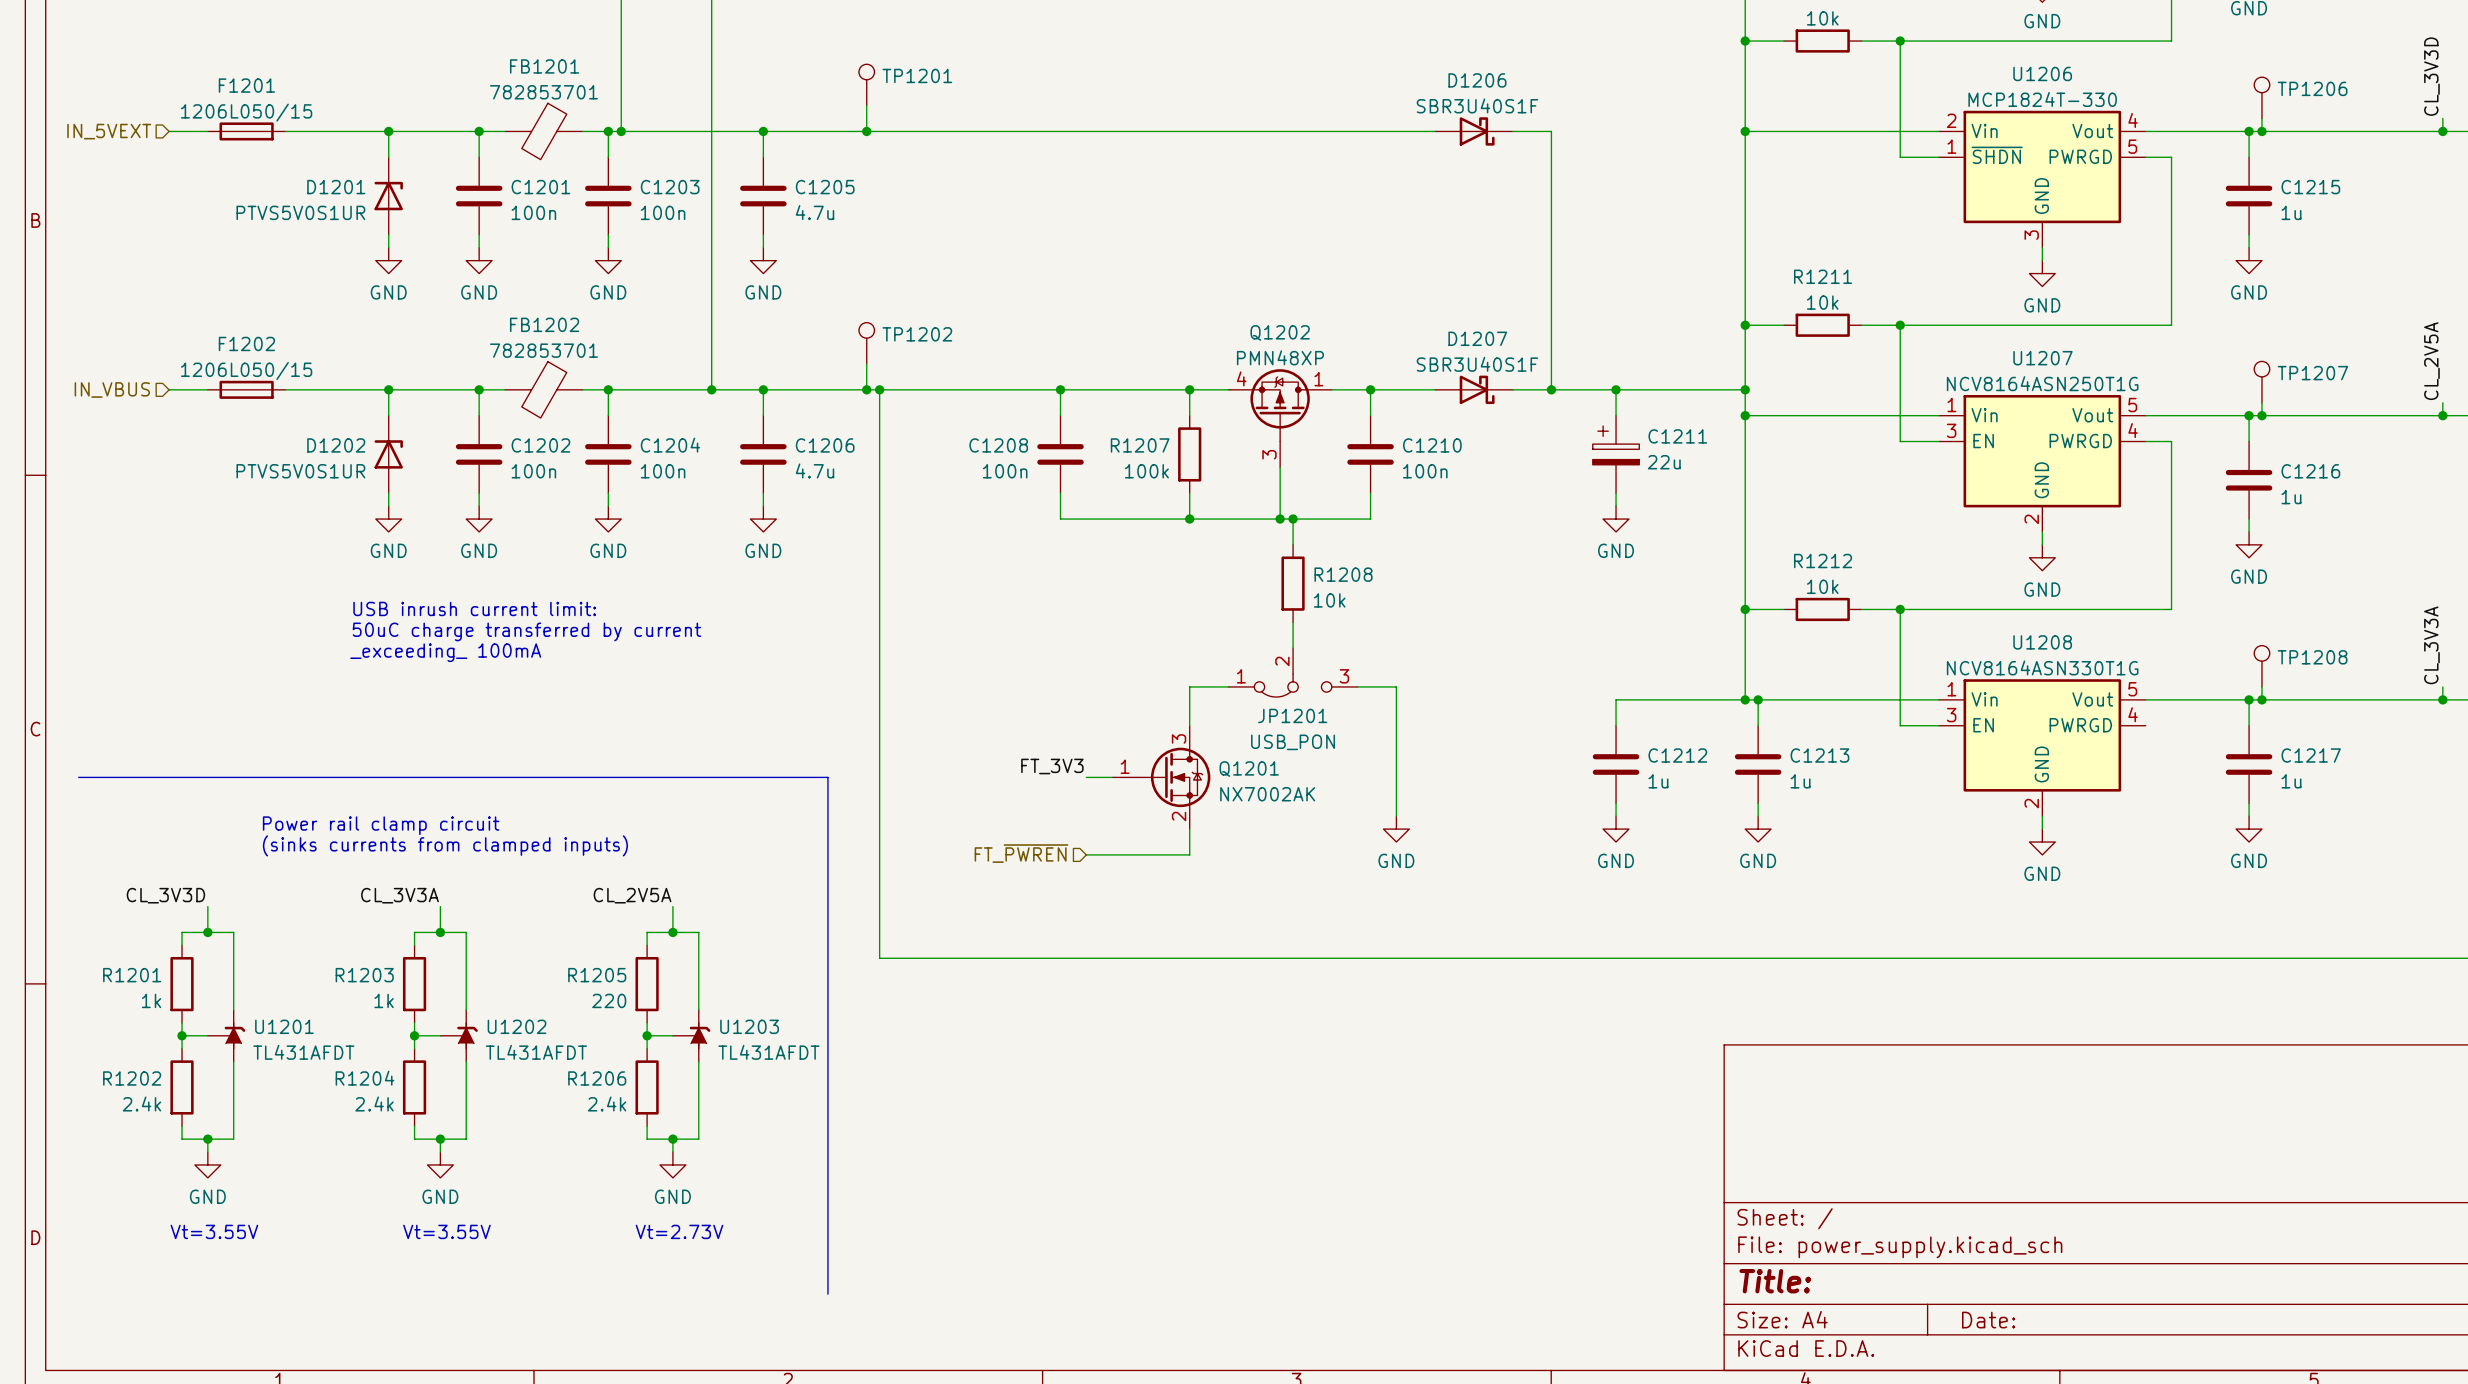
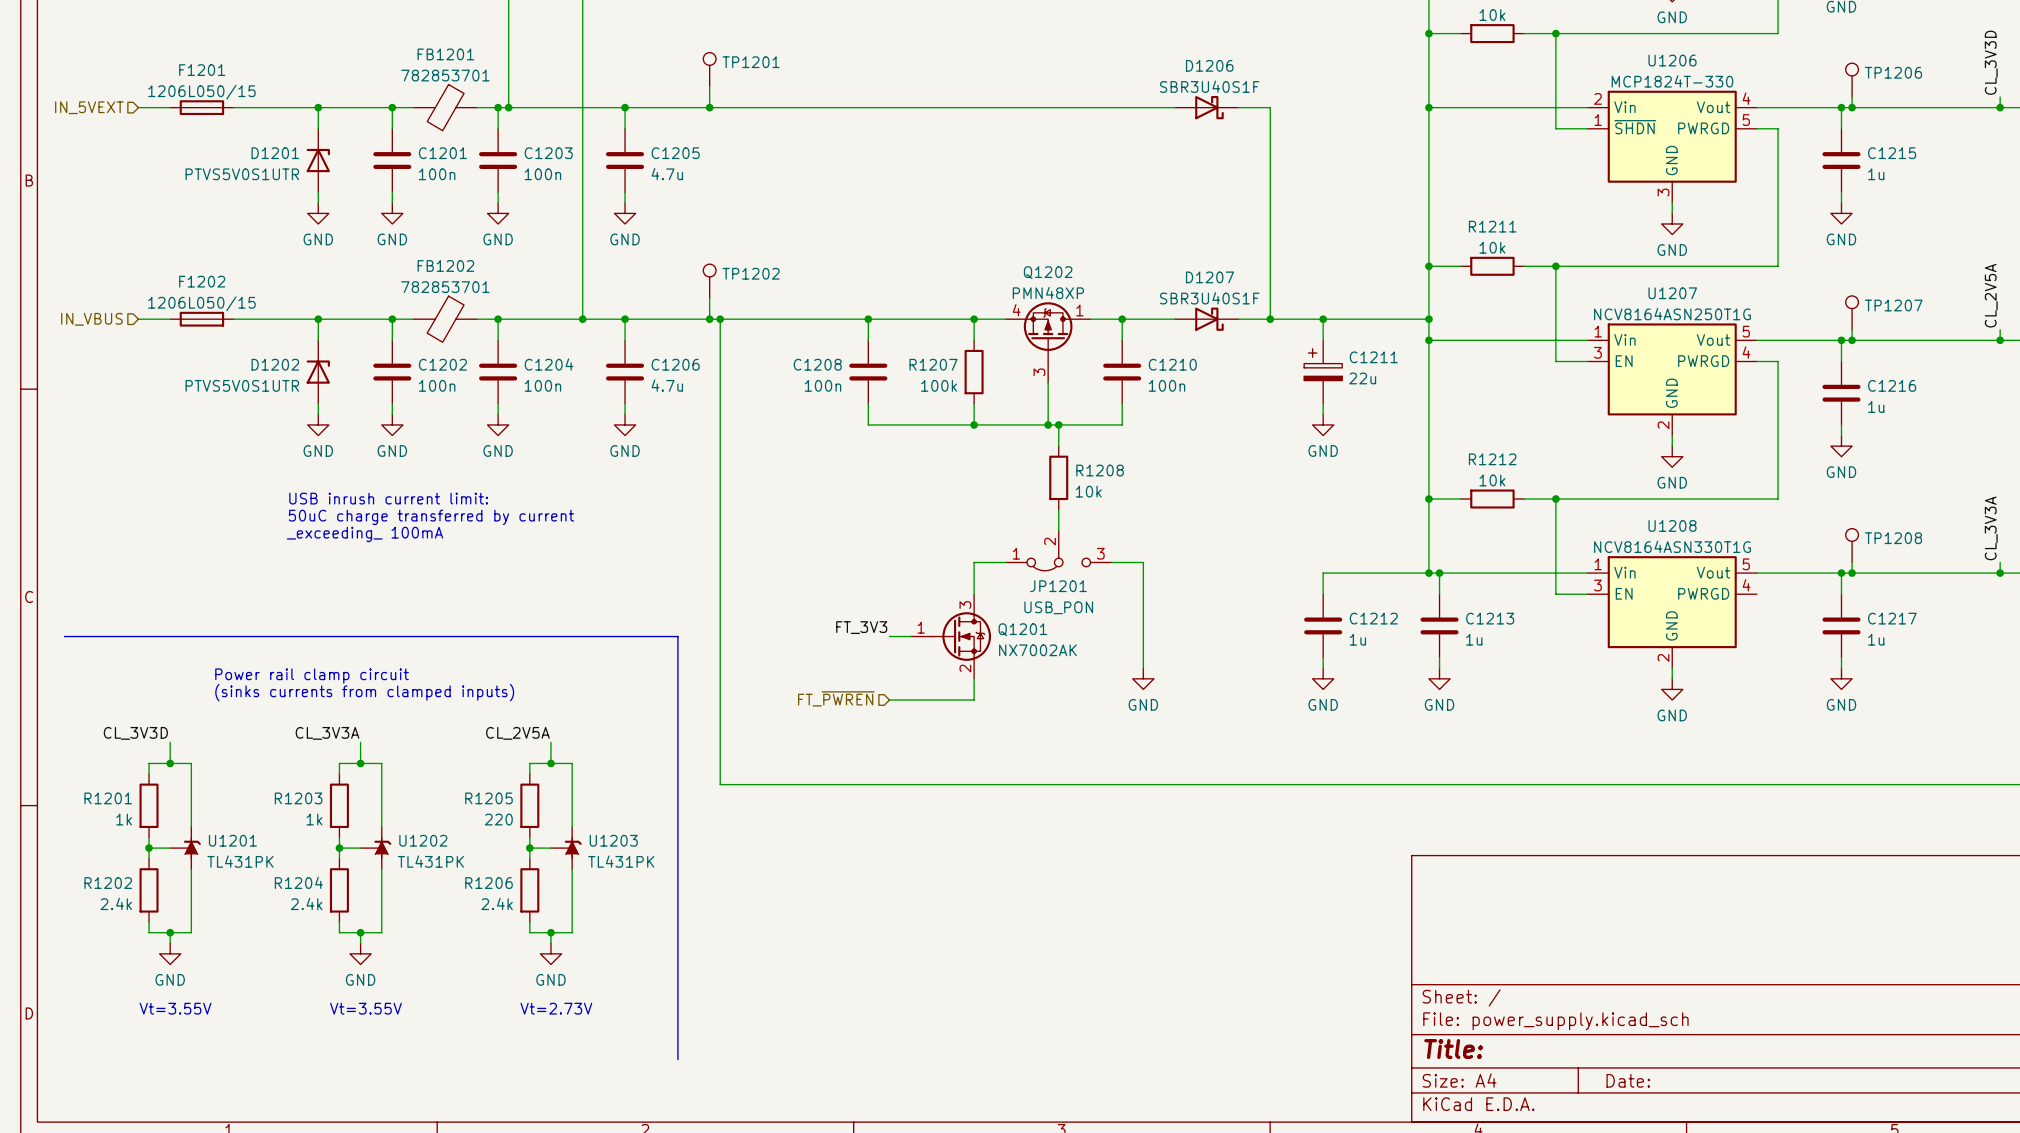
D1201 value: PTVS5V0S1UR (300, 212) -> PTVS5V0S1UTR (242, 174)
D1202 value: PTVS5V0S1UR (300, 471) -> PTVS5V0S1UTR (242, 385)
U1201 value: TL431AFDT (303, 1052) -> TL431PK (240, 861)
U1202 value: TL431AFDT (536, 1052) -> TL431PK (430, 861)
U1203 value: TL431AFDT (768, 1052) -> TL431PK (621, 861)

